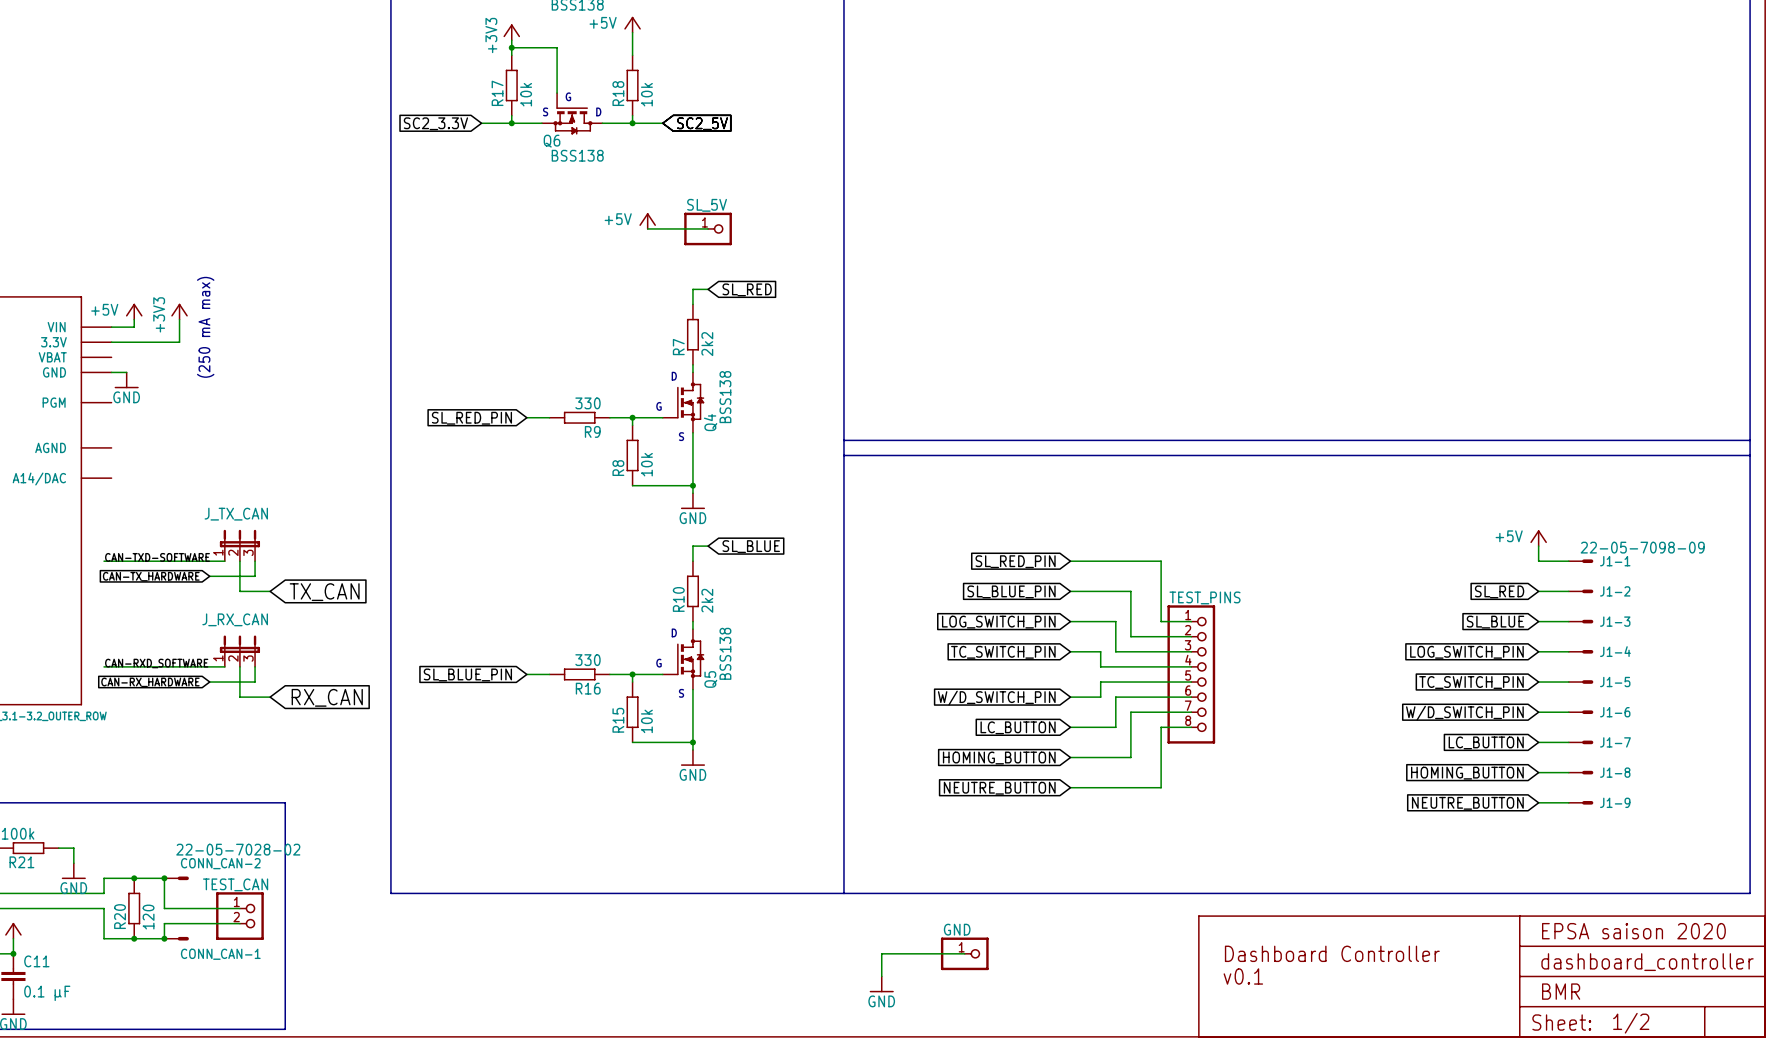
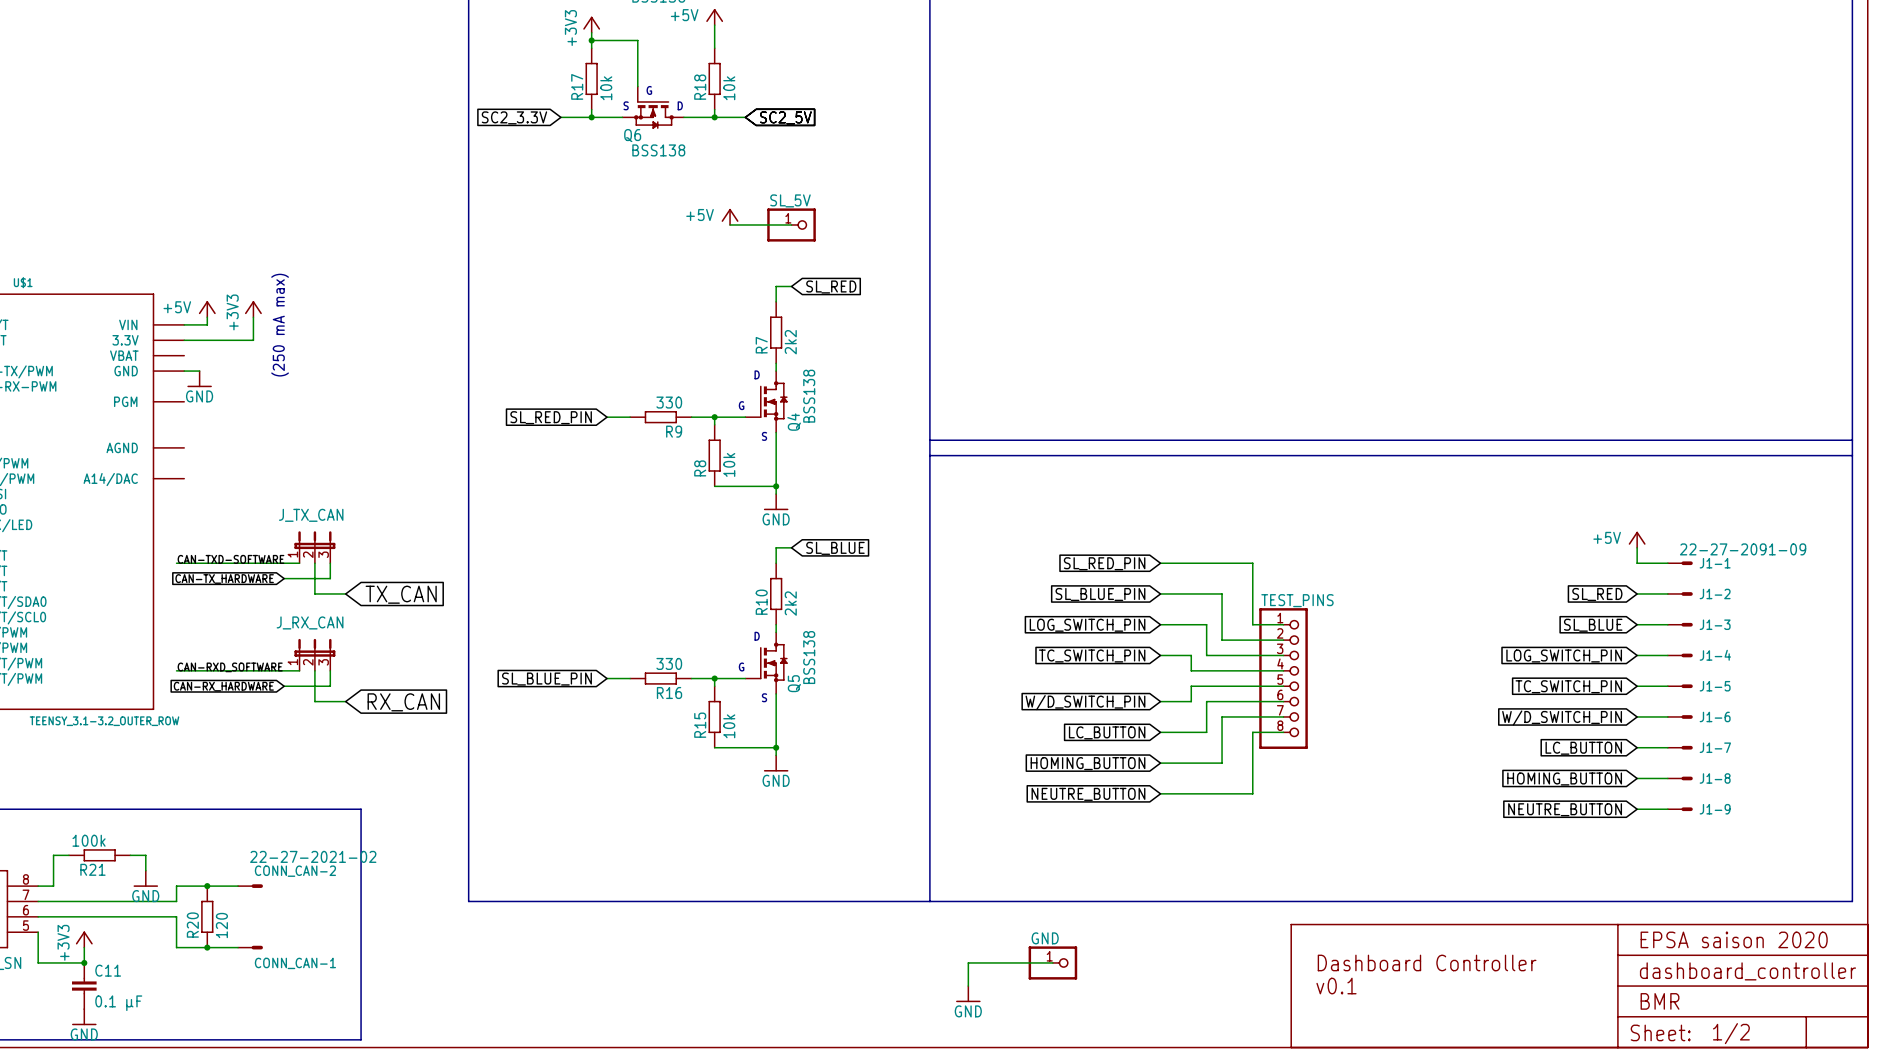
J1-1 value: 22-05-7098-09 (1642, 547) -> 22-27-2091-09 (1743, 549)
CONN_CAN-1 value: 22-05-7028-02 (238, 849) -> 22-27-2021-02 (313, 856)
wire: (164, 878) (164, 908) (239, 908) -> none
junction: (164, 878) -> none
TEST_CAN: (239, 916) -> none
wire: (239, 923) (164, 923) (164, 938) -> none
junction: (164, 938) -> none

